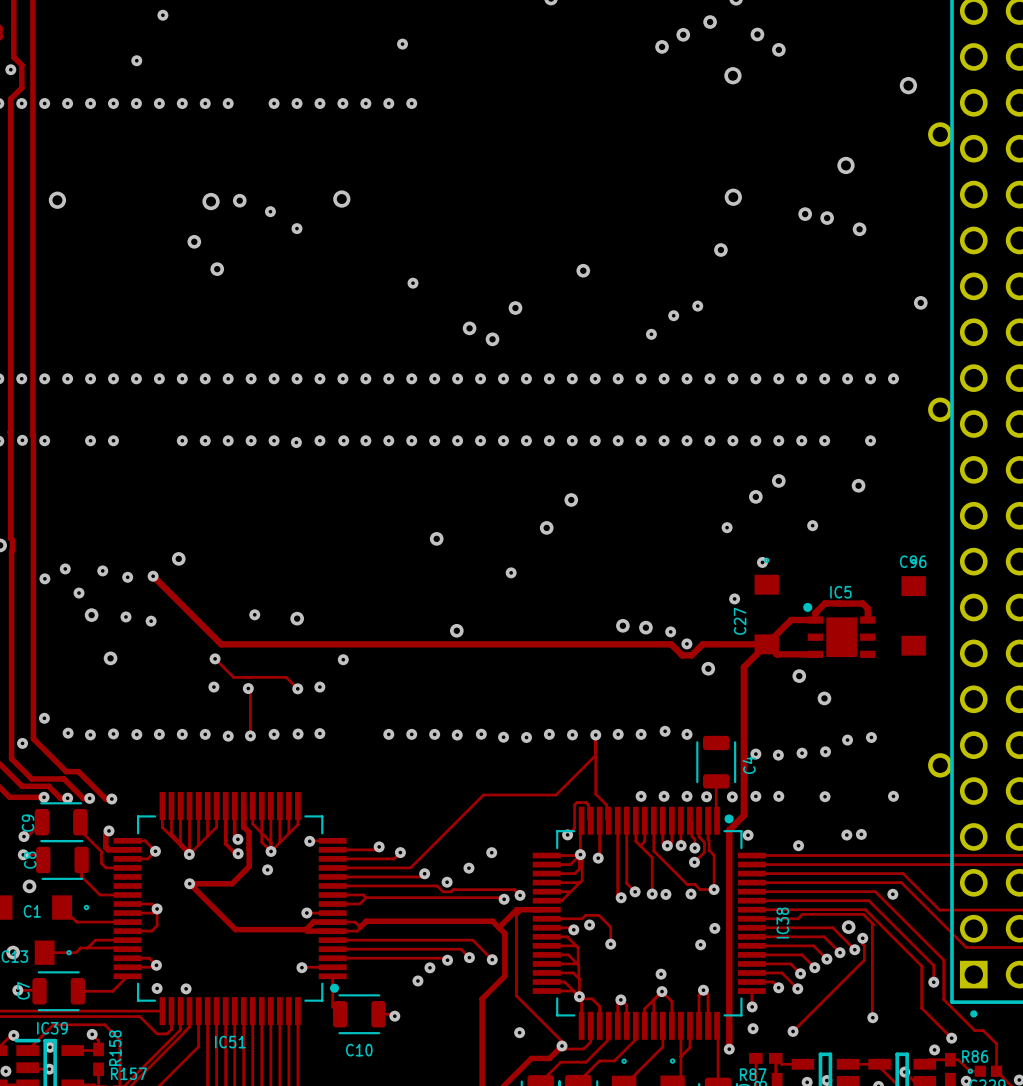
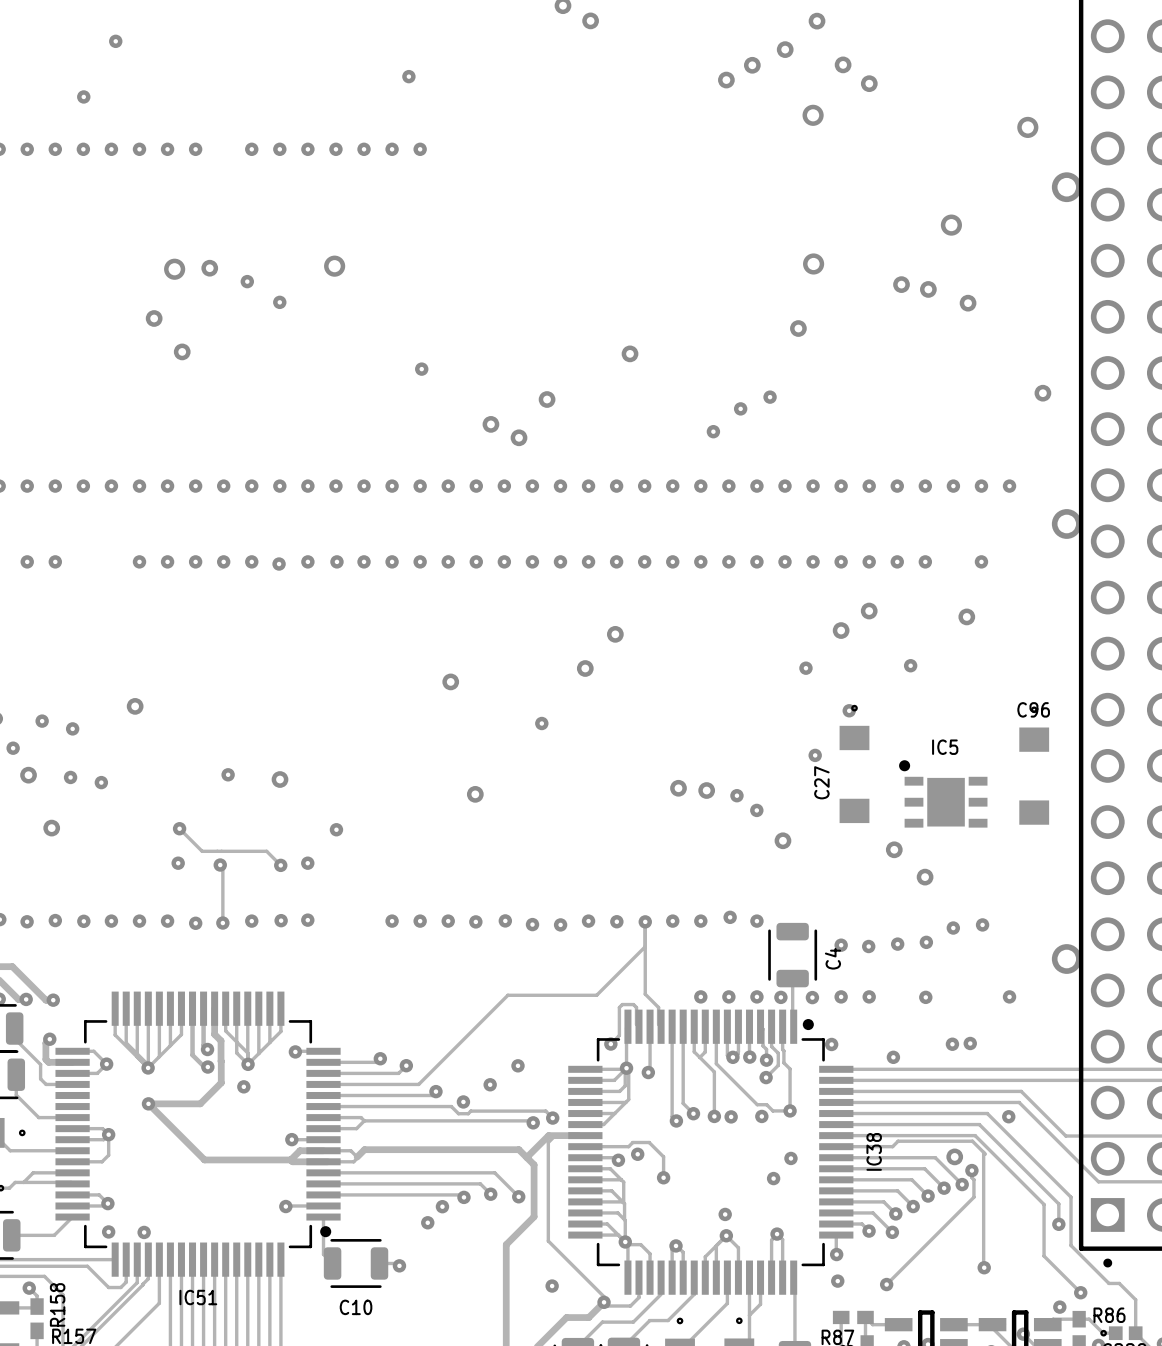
track: (153, 576) (221, 644) (671, 644) (682, 655) (691, 655) (702, 644) (766, 644) (776, 654) (815, 654) -> none
via: (153, 576) -> none
track: (839, 603) (825, 603) (815, 613) (815, 620) (791, 620) (743, 667) (743, 815) (729, 830) (729, 1049) -> none
track: (839, 603) (862, 603) (867, 608) (867, 620) -> none
via: (729, 1049) -> none

